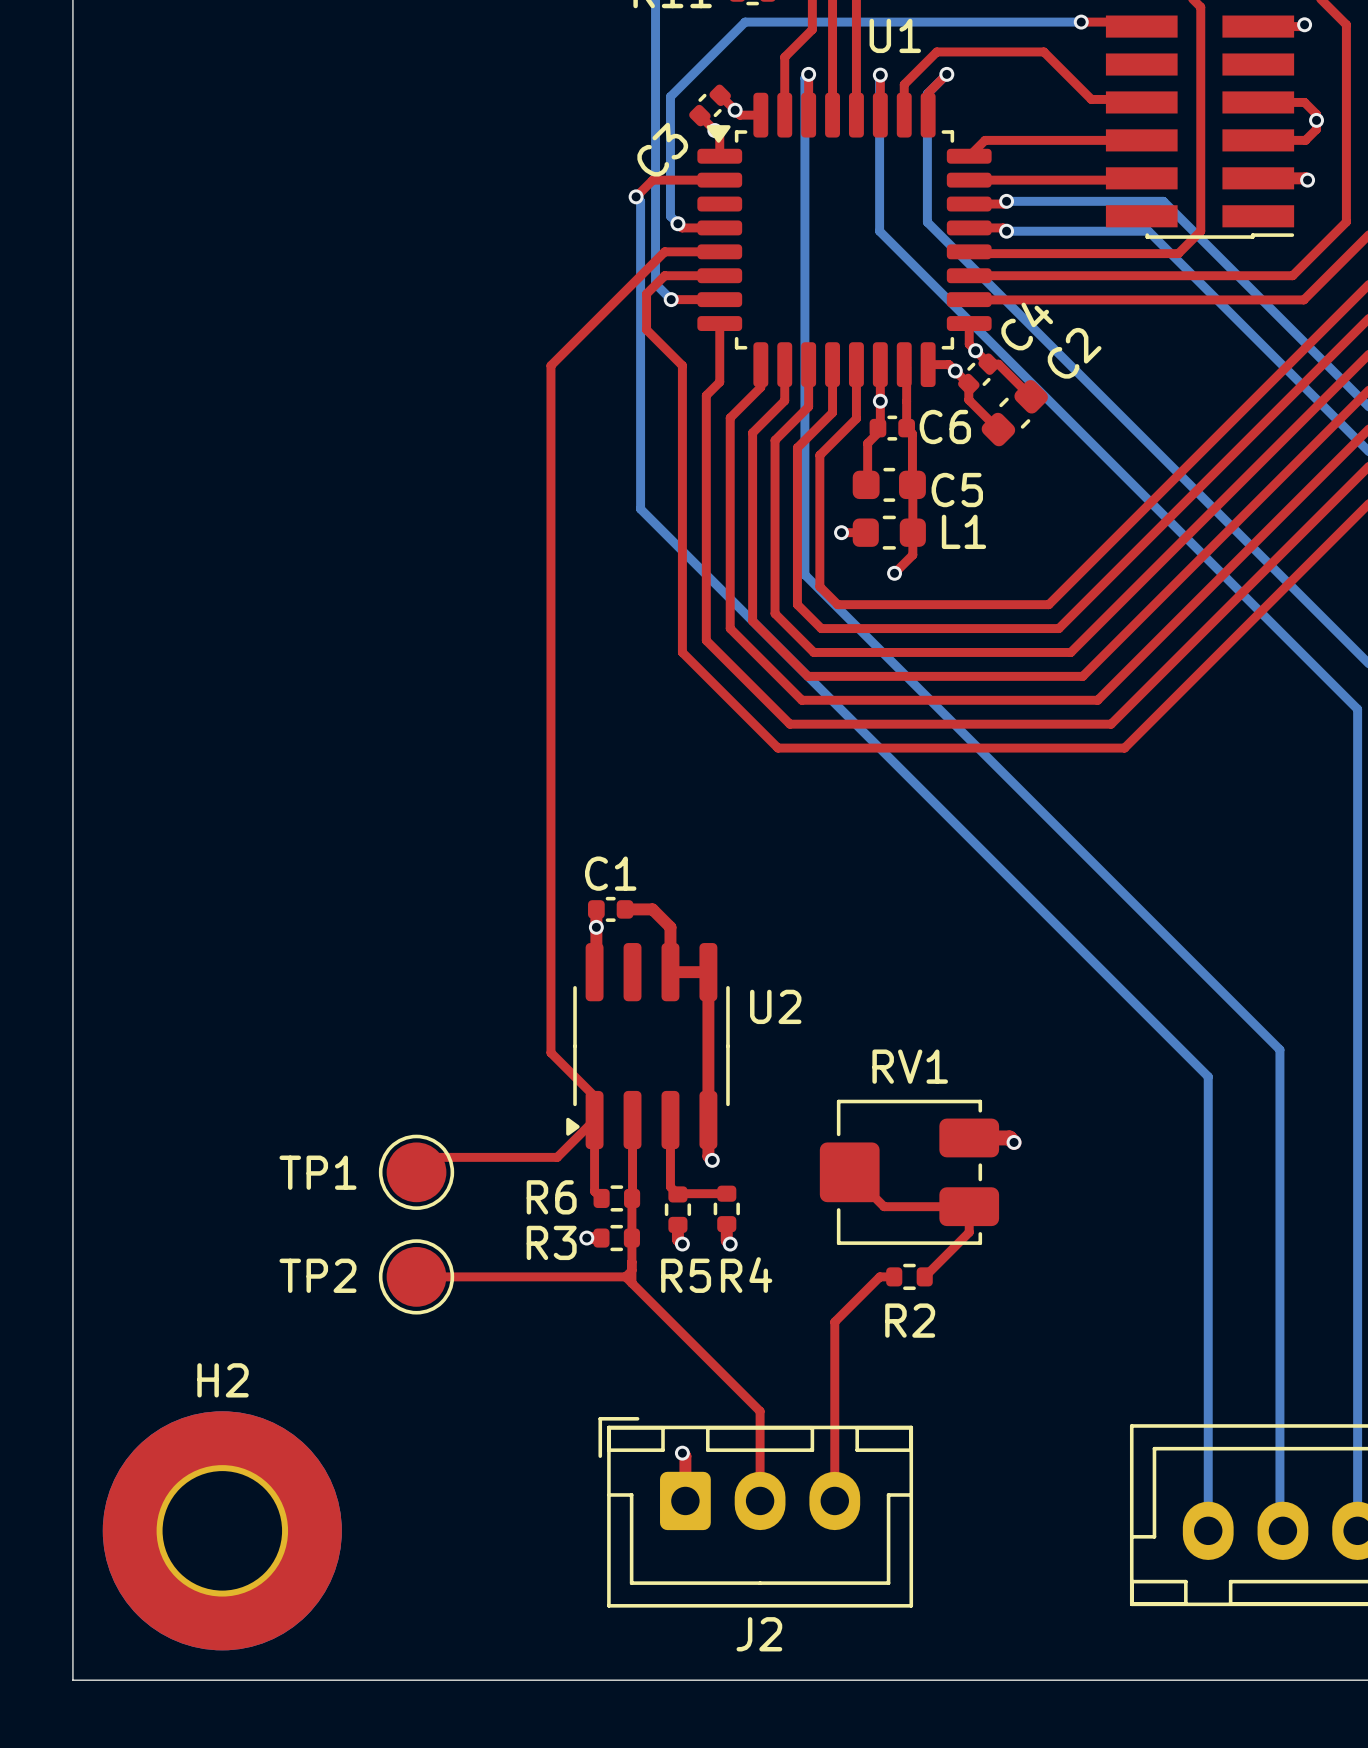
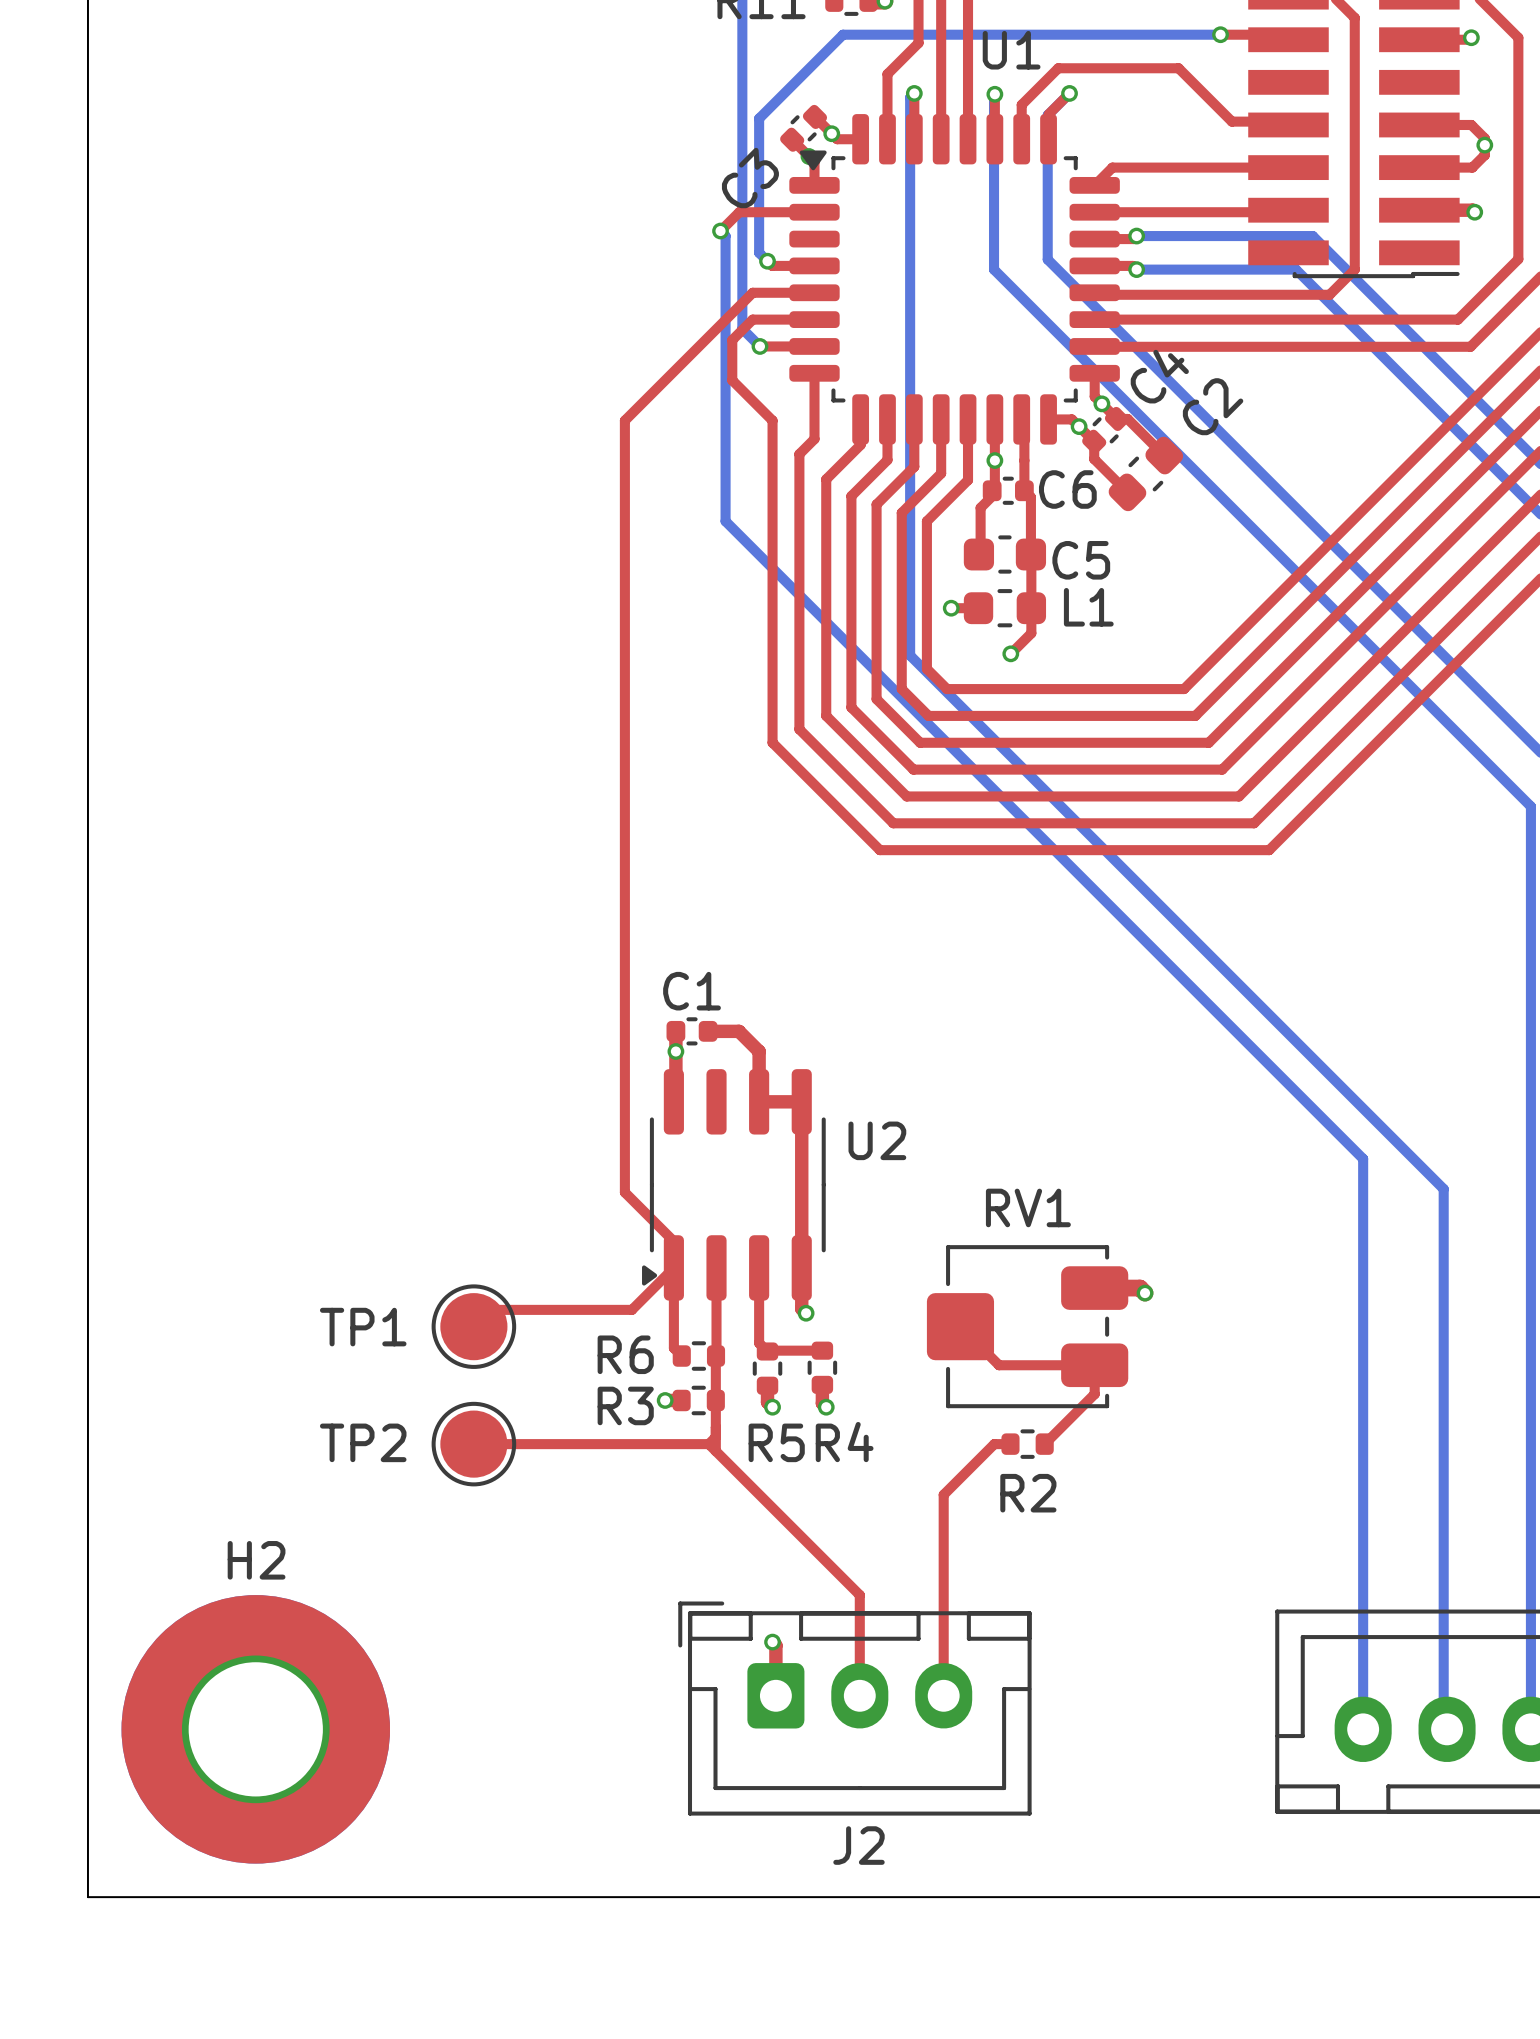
bottom track: (640, 455) (640, 509) (1208, 1076) -> (725, 521) (1363, 1158) (1363, 1219)

